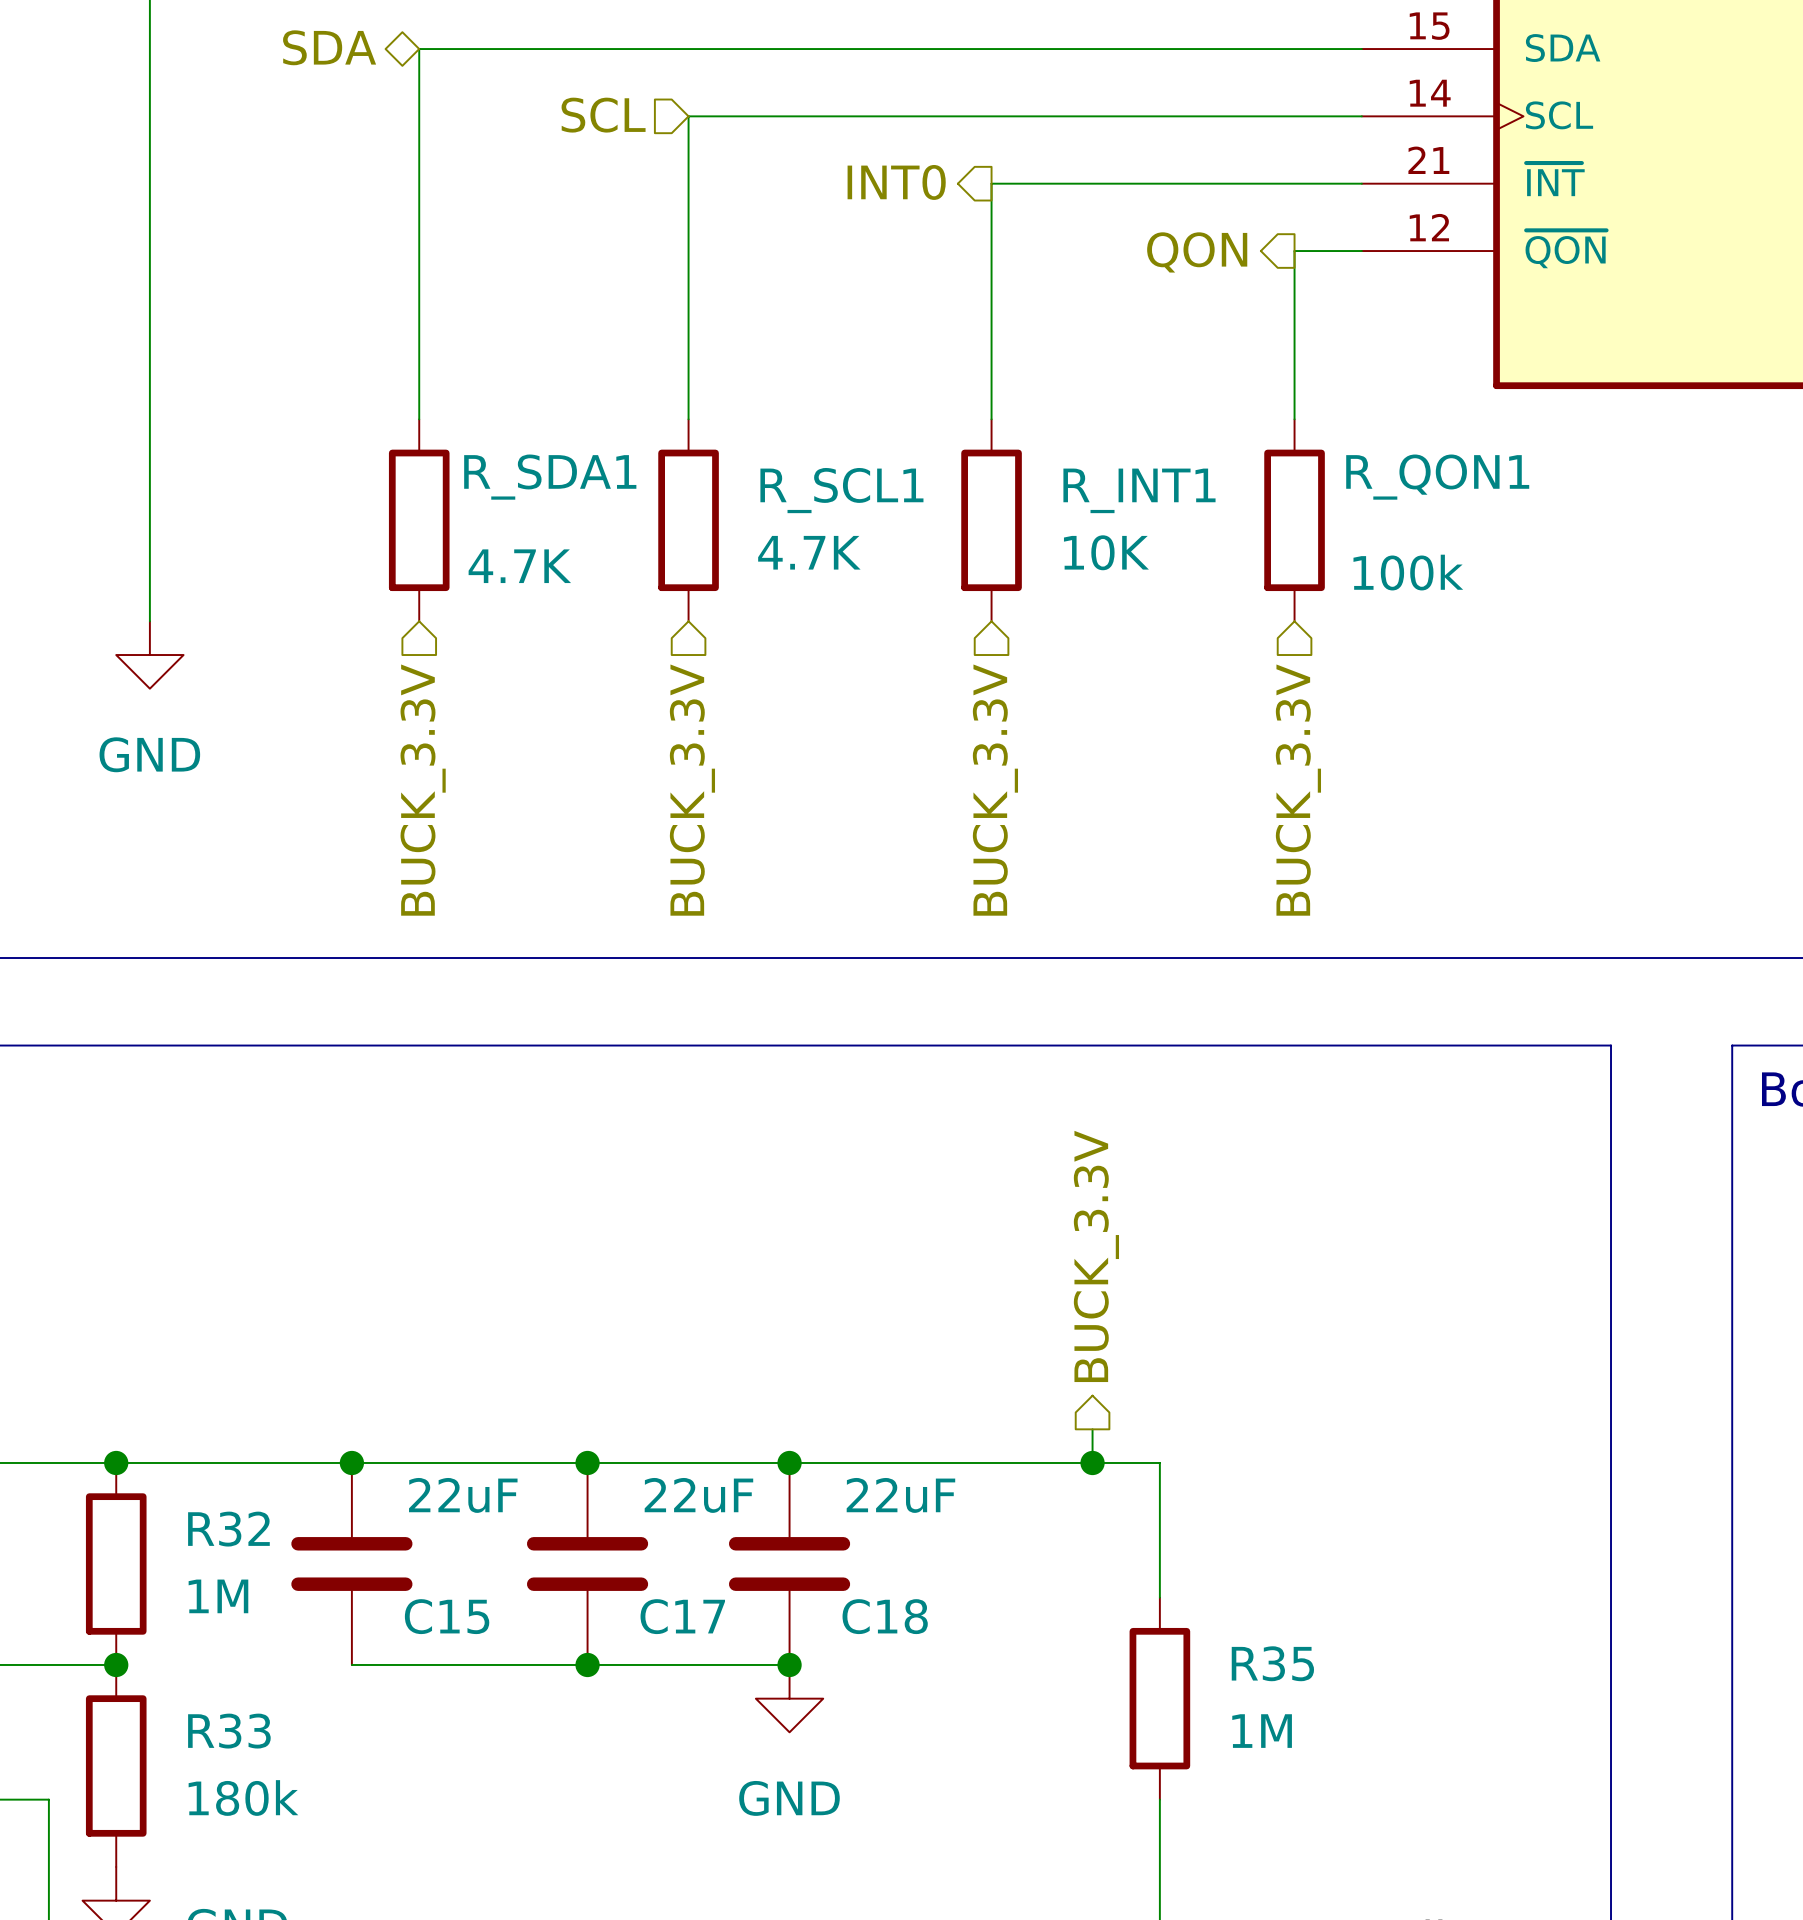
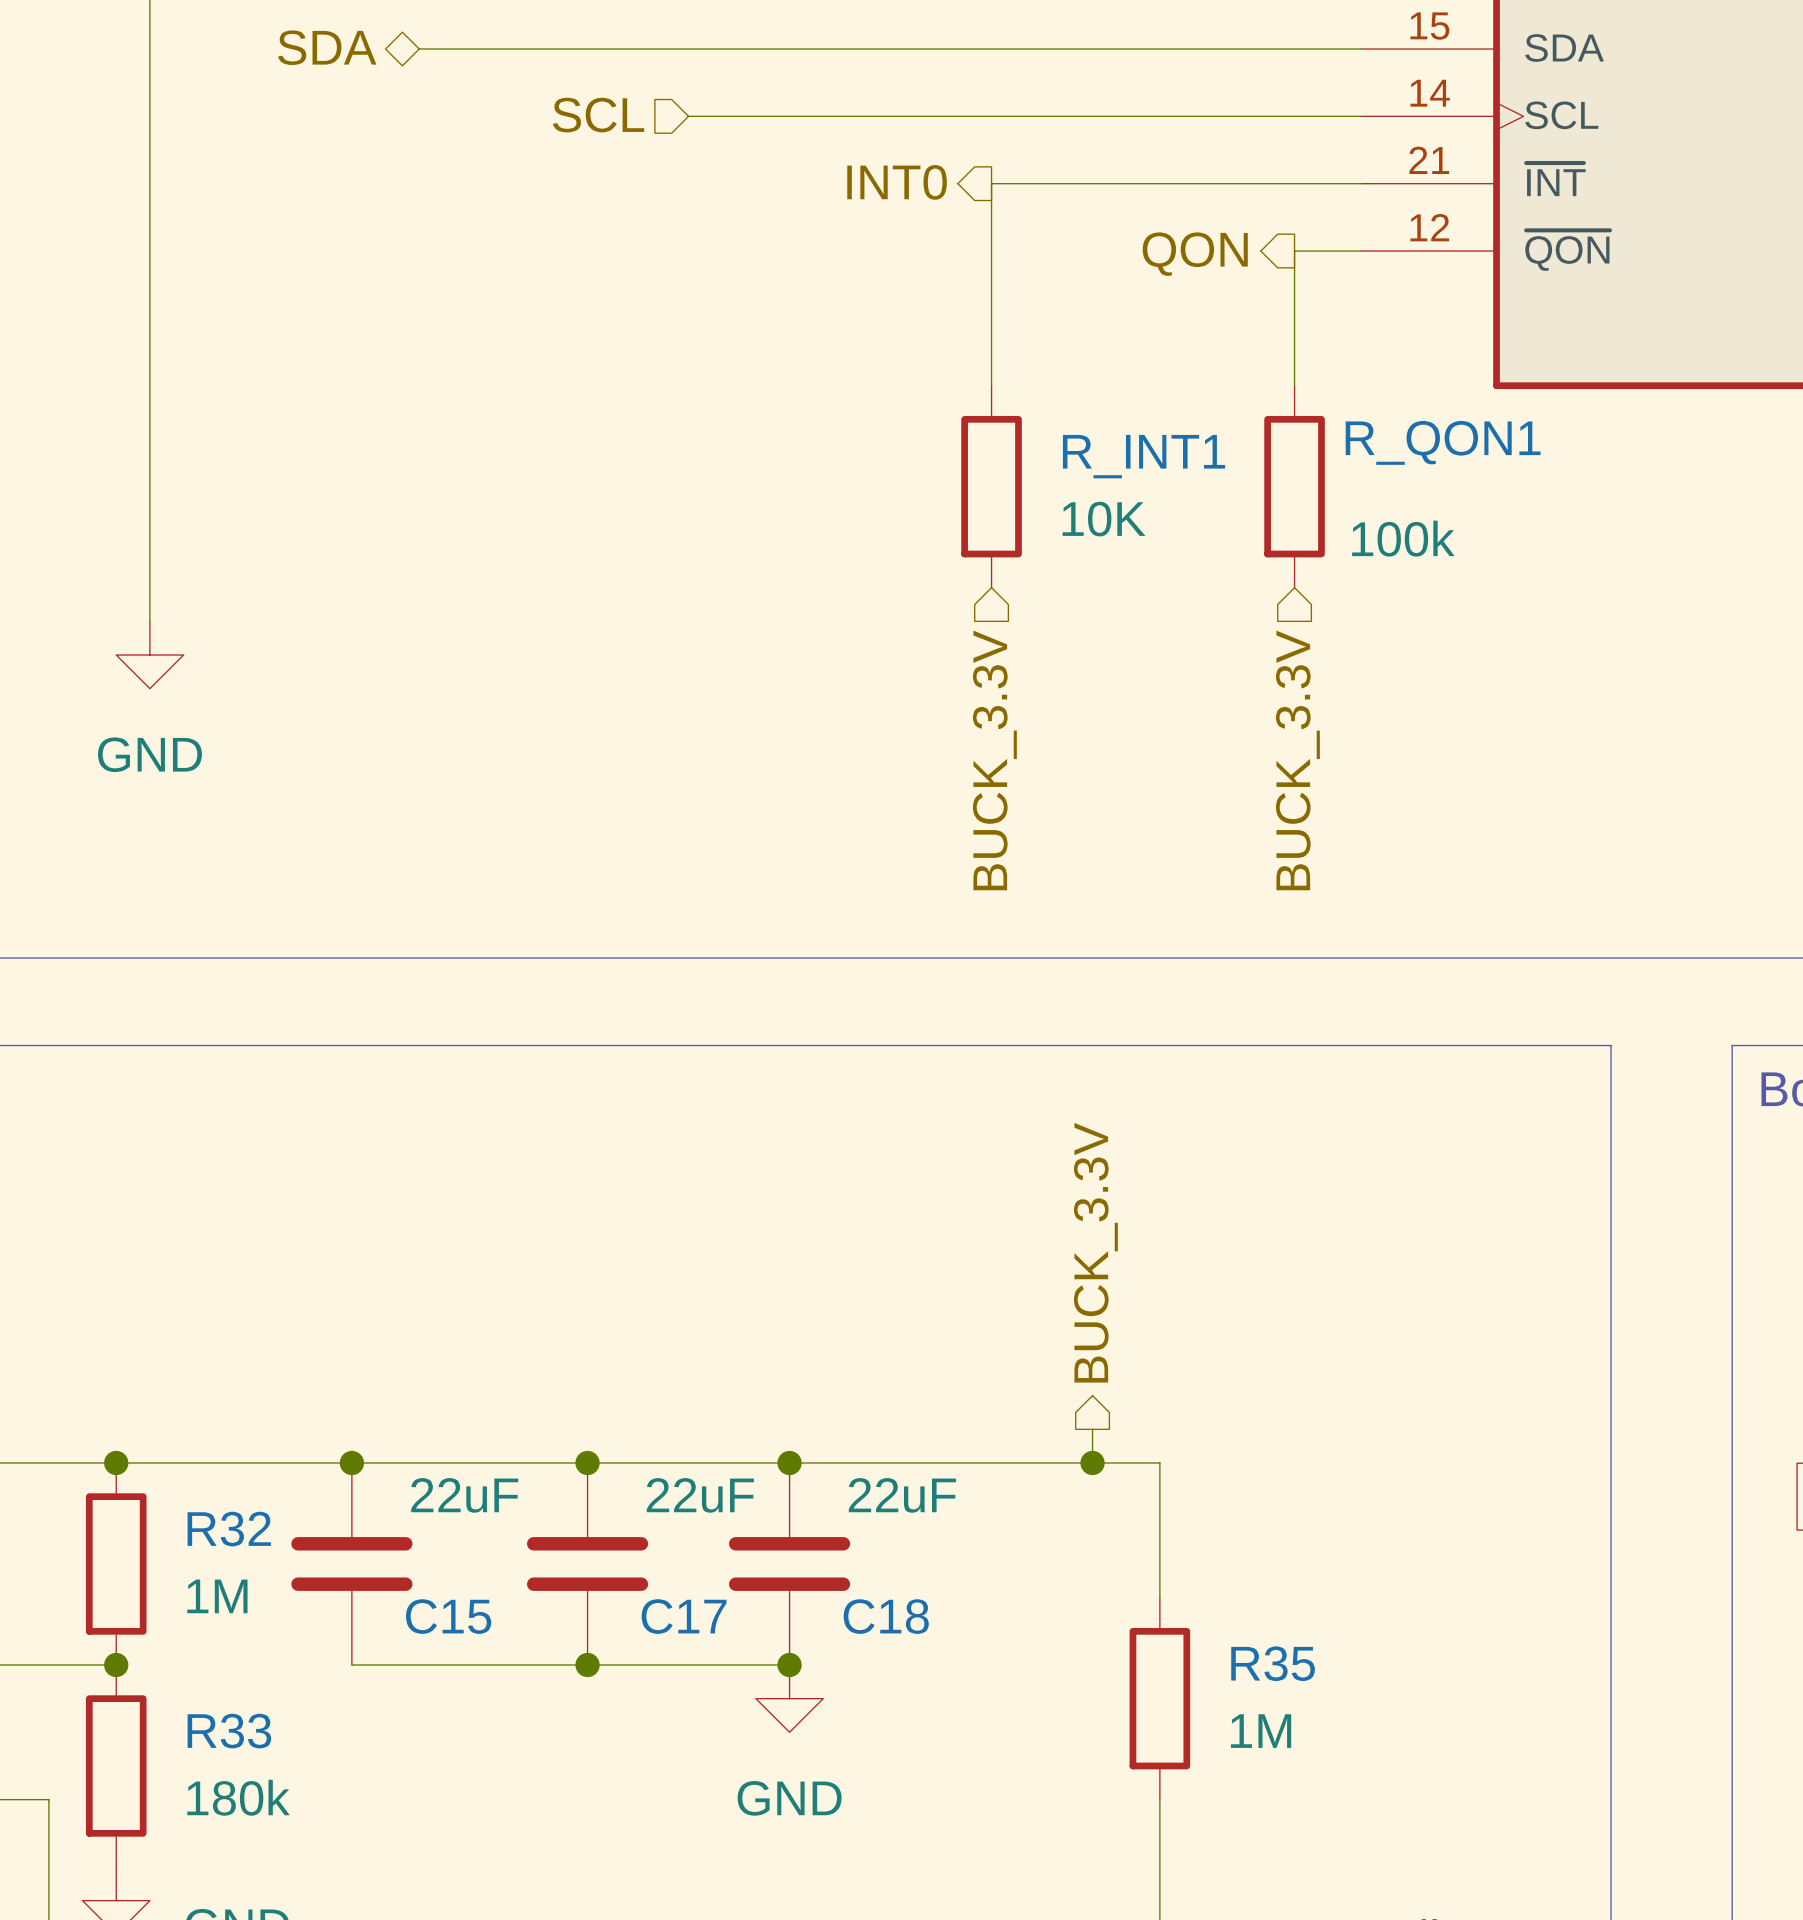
wire: (419, 49) (419, 419) -> none
wire: (688, 116) (688, 419) -> none
R_SDA1: 4.7K (419, 520) -> none
R_SCL1: 4.7K (688, 520) -> none
R_INT1 position: (991, 520) -> (991, 486)
R_QON1 position: (1294, 520) -> (1294, 486)
hierarchical label: BUCK_3.3V (423, 790) -> none
hierarchical label: BUCK_3.3V (692, 790) -> none
hierarchical label position: BUCK_3.3V (995, 790) -> BUCK_3.3V (994, 760)
hierarchical label position: BUCK_3.3V (1298, 790) -> BUCK_3.3V (1297, 760)

